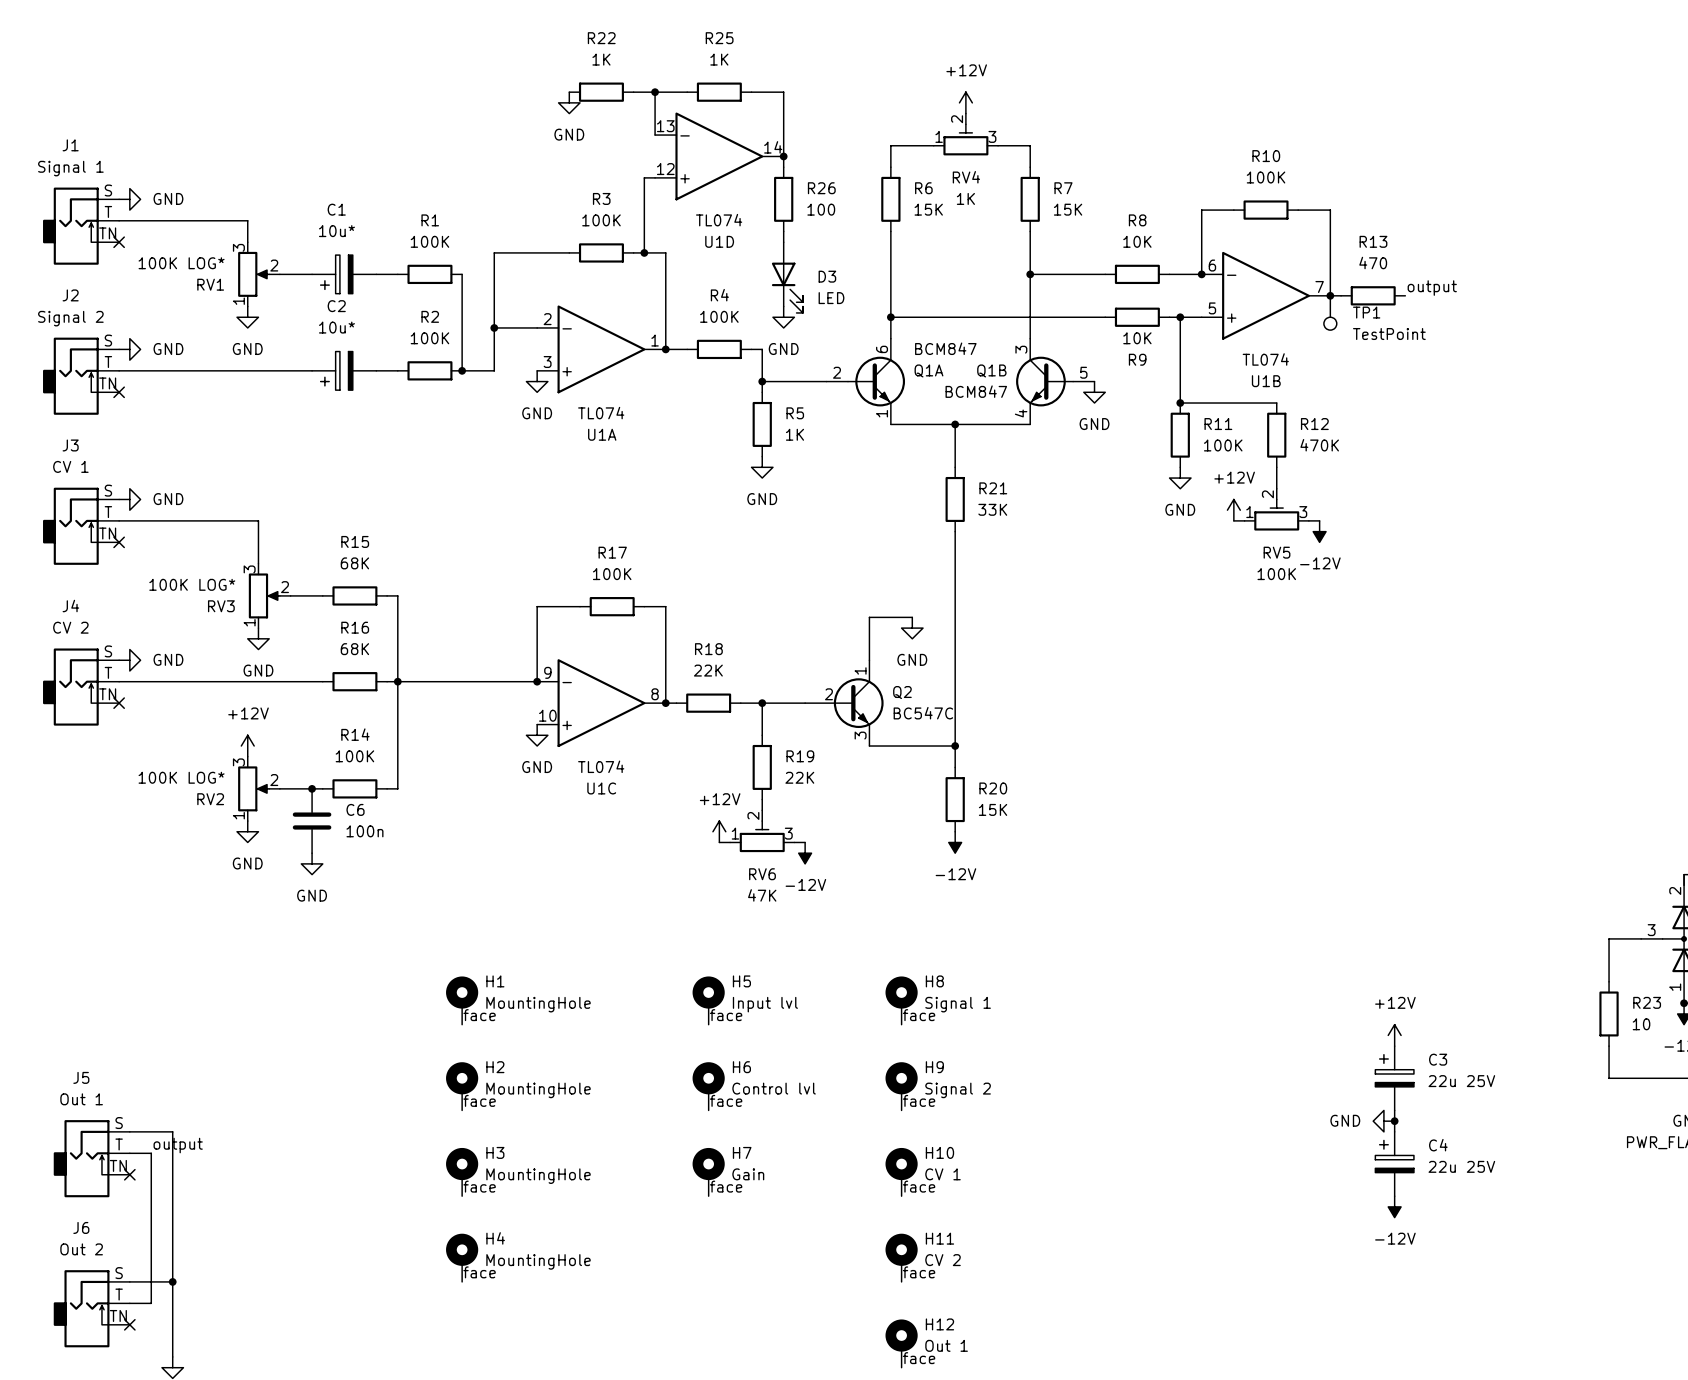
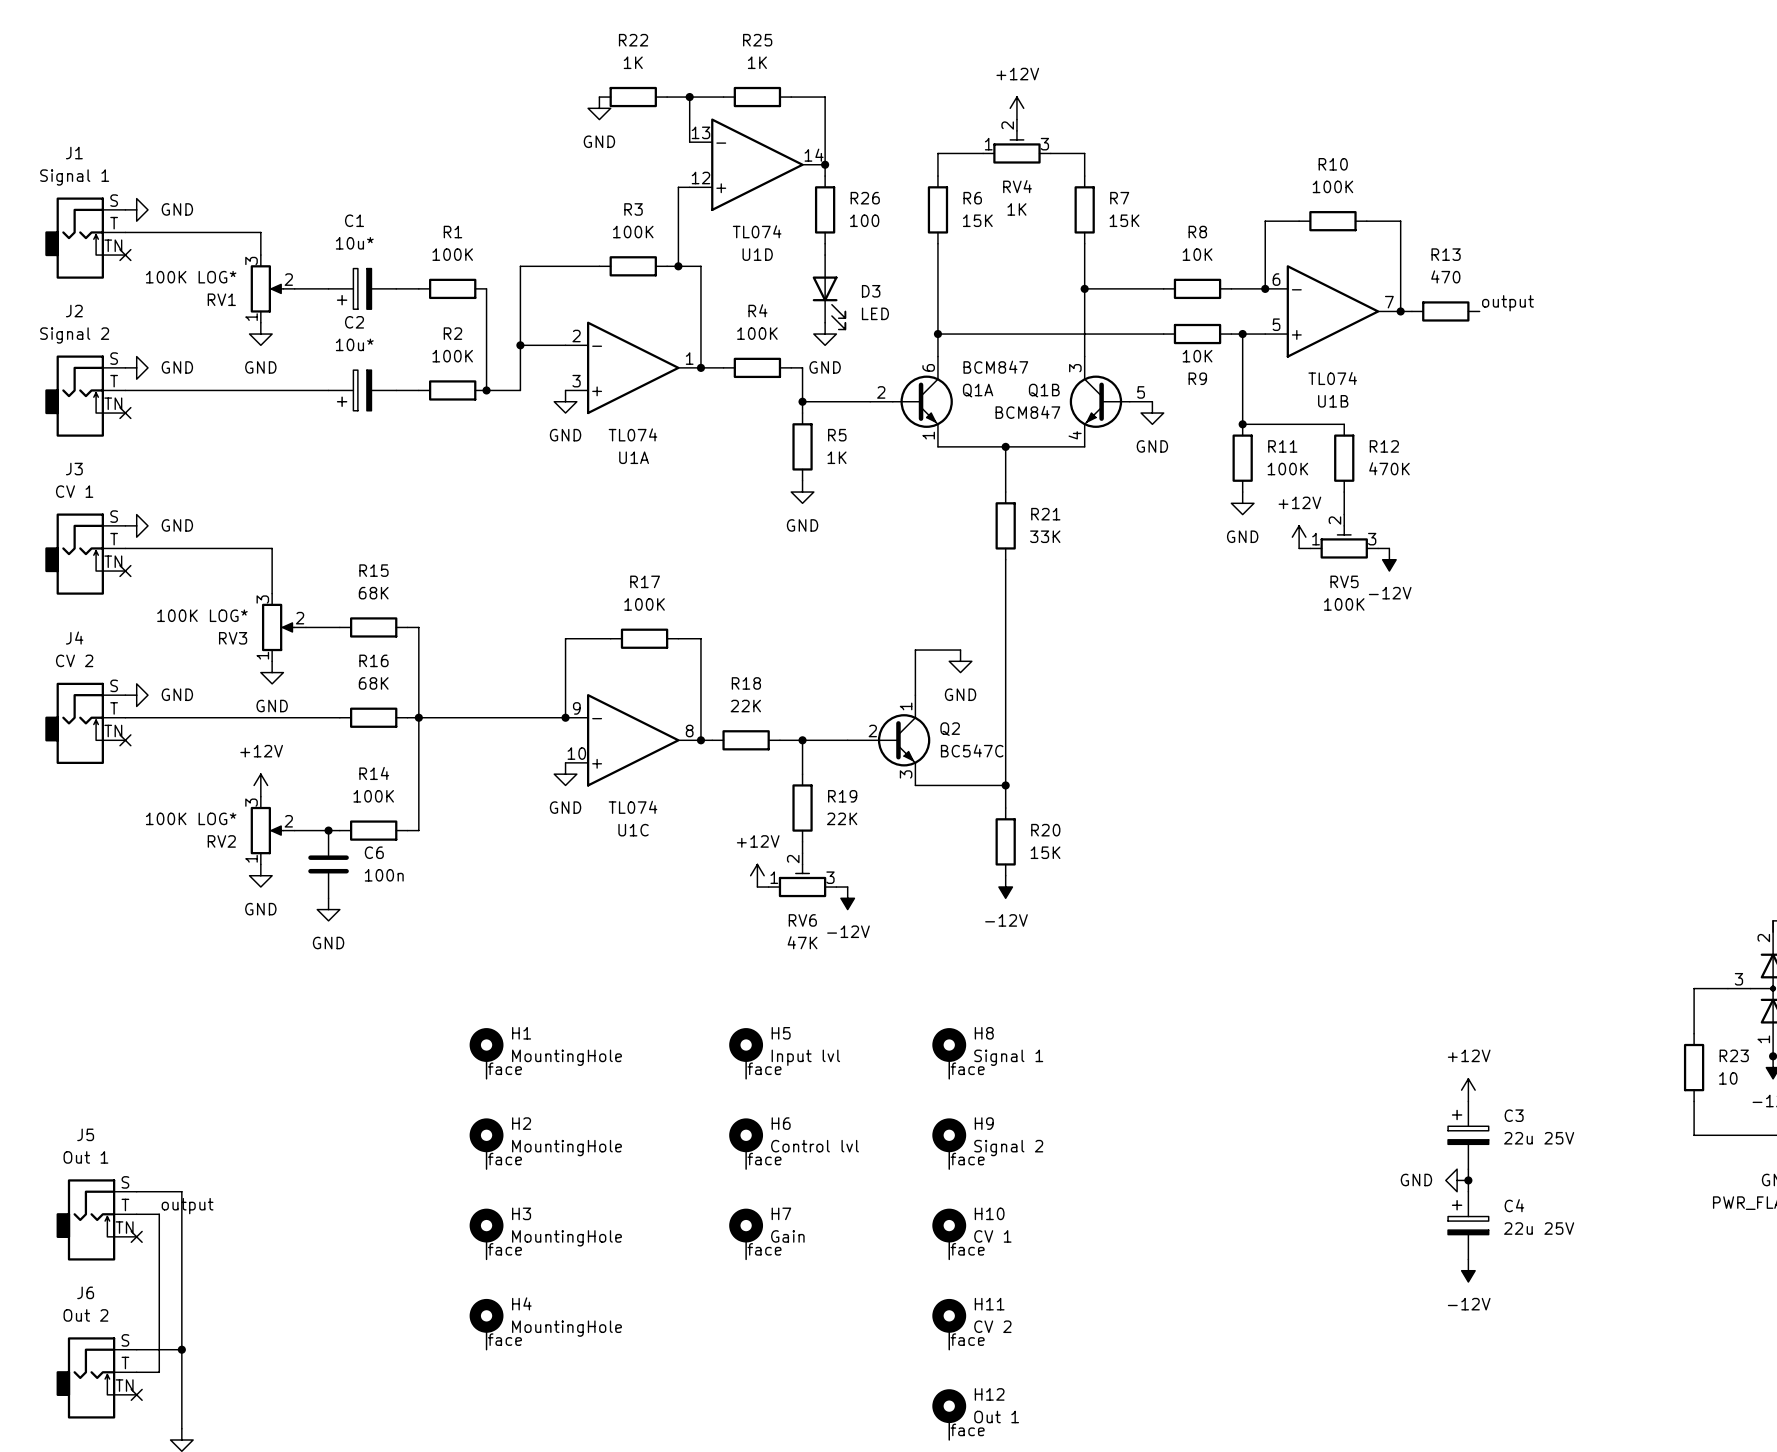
TP1: TestPoint (1330, 312) -> none

